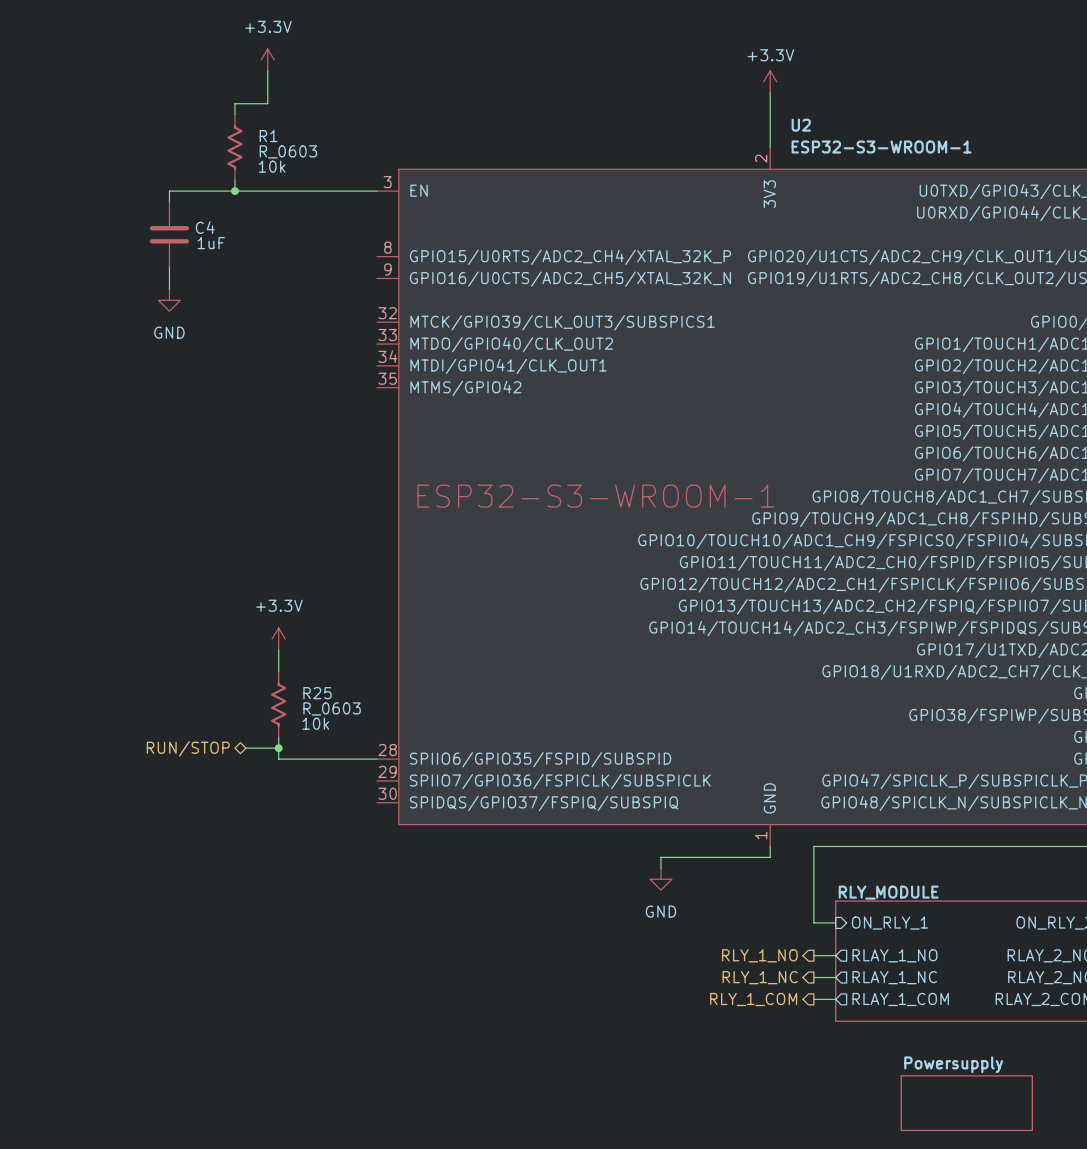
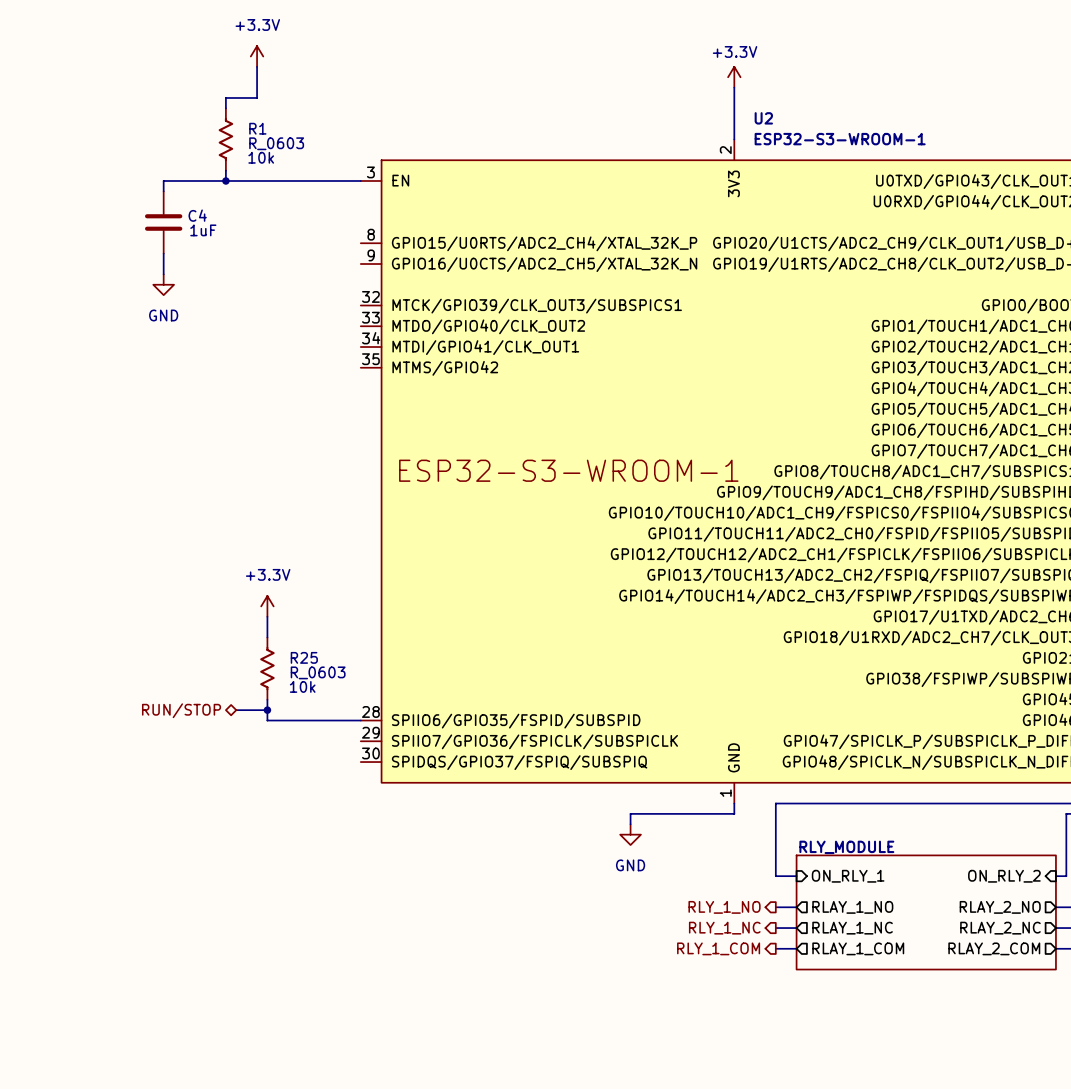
sheet Powersupply: (966, 1103) -> none

